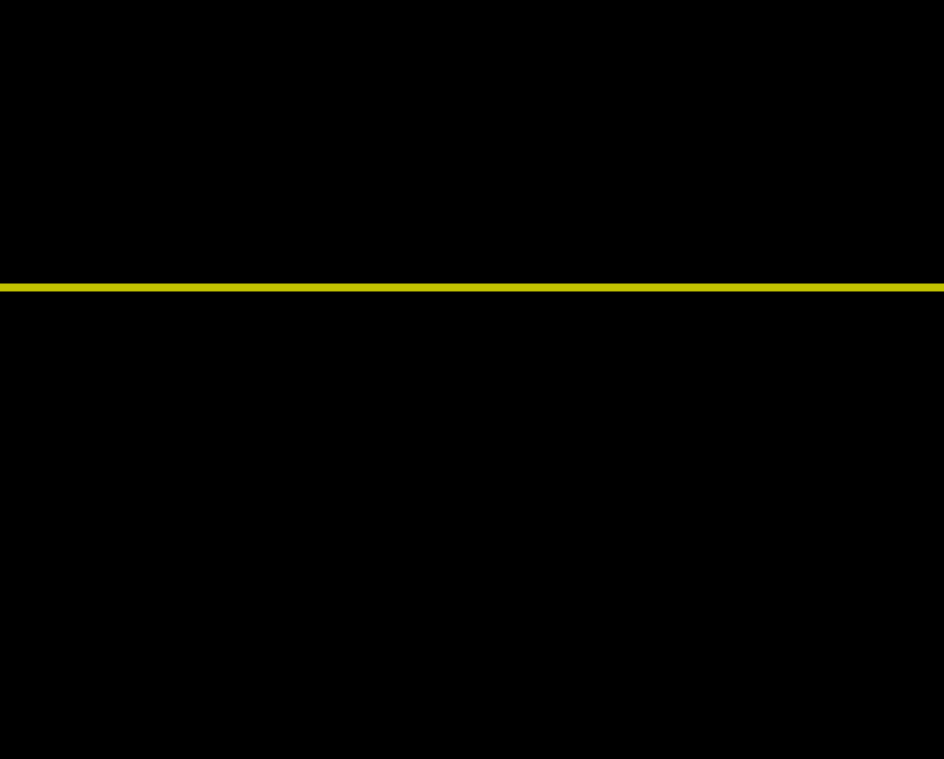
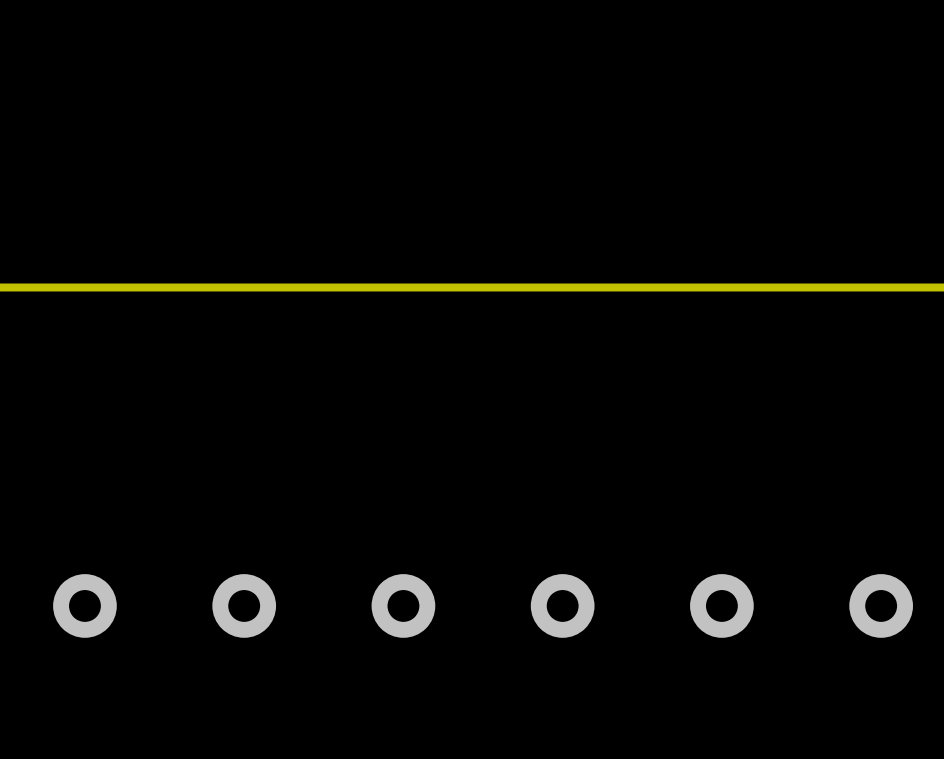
via: none -> (84, 605)
via: none -> (244, 605)
via: none -> (403, 605)
via: none -> (562, 605)
via: none -> (721, 605)
via: none -> (881, 605)

